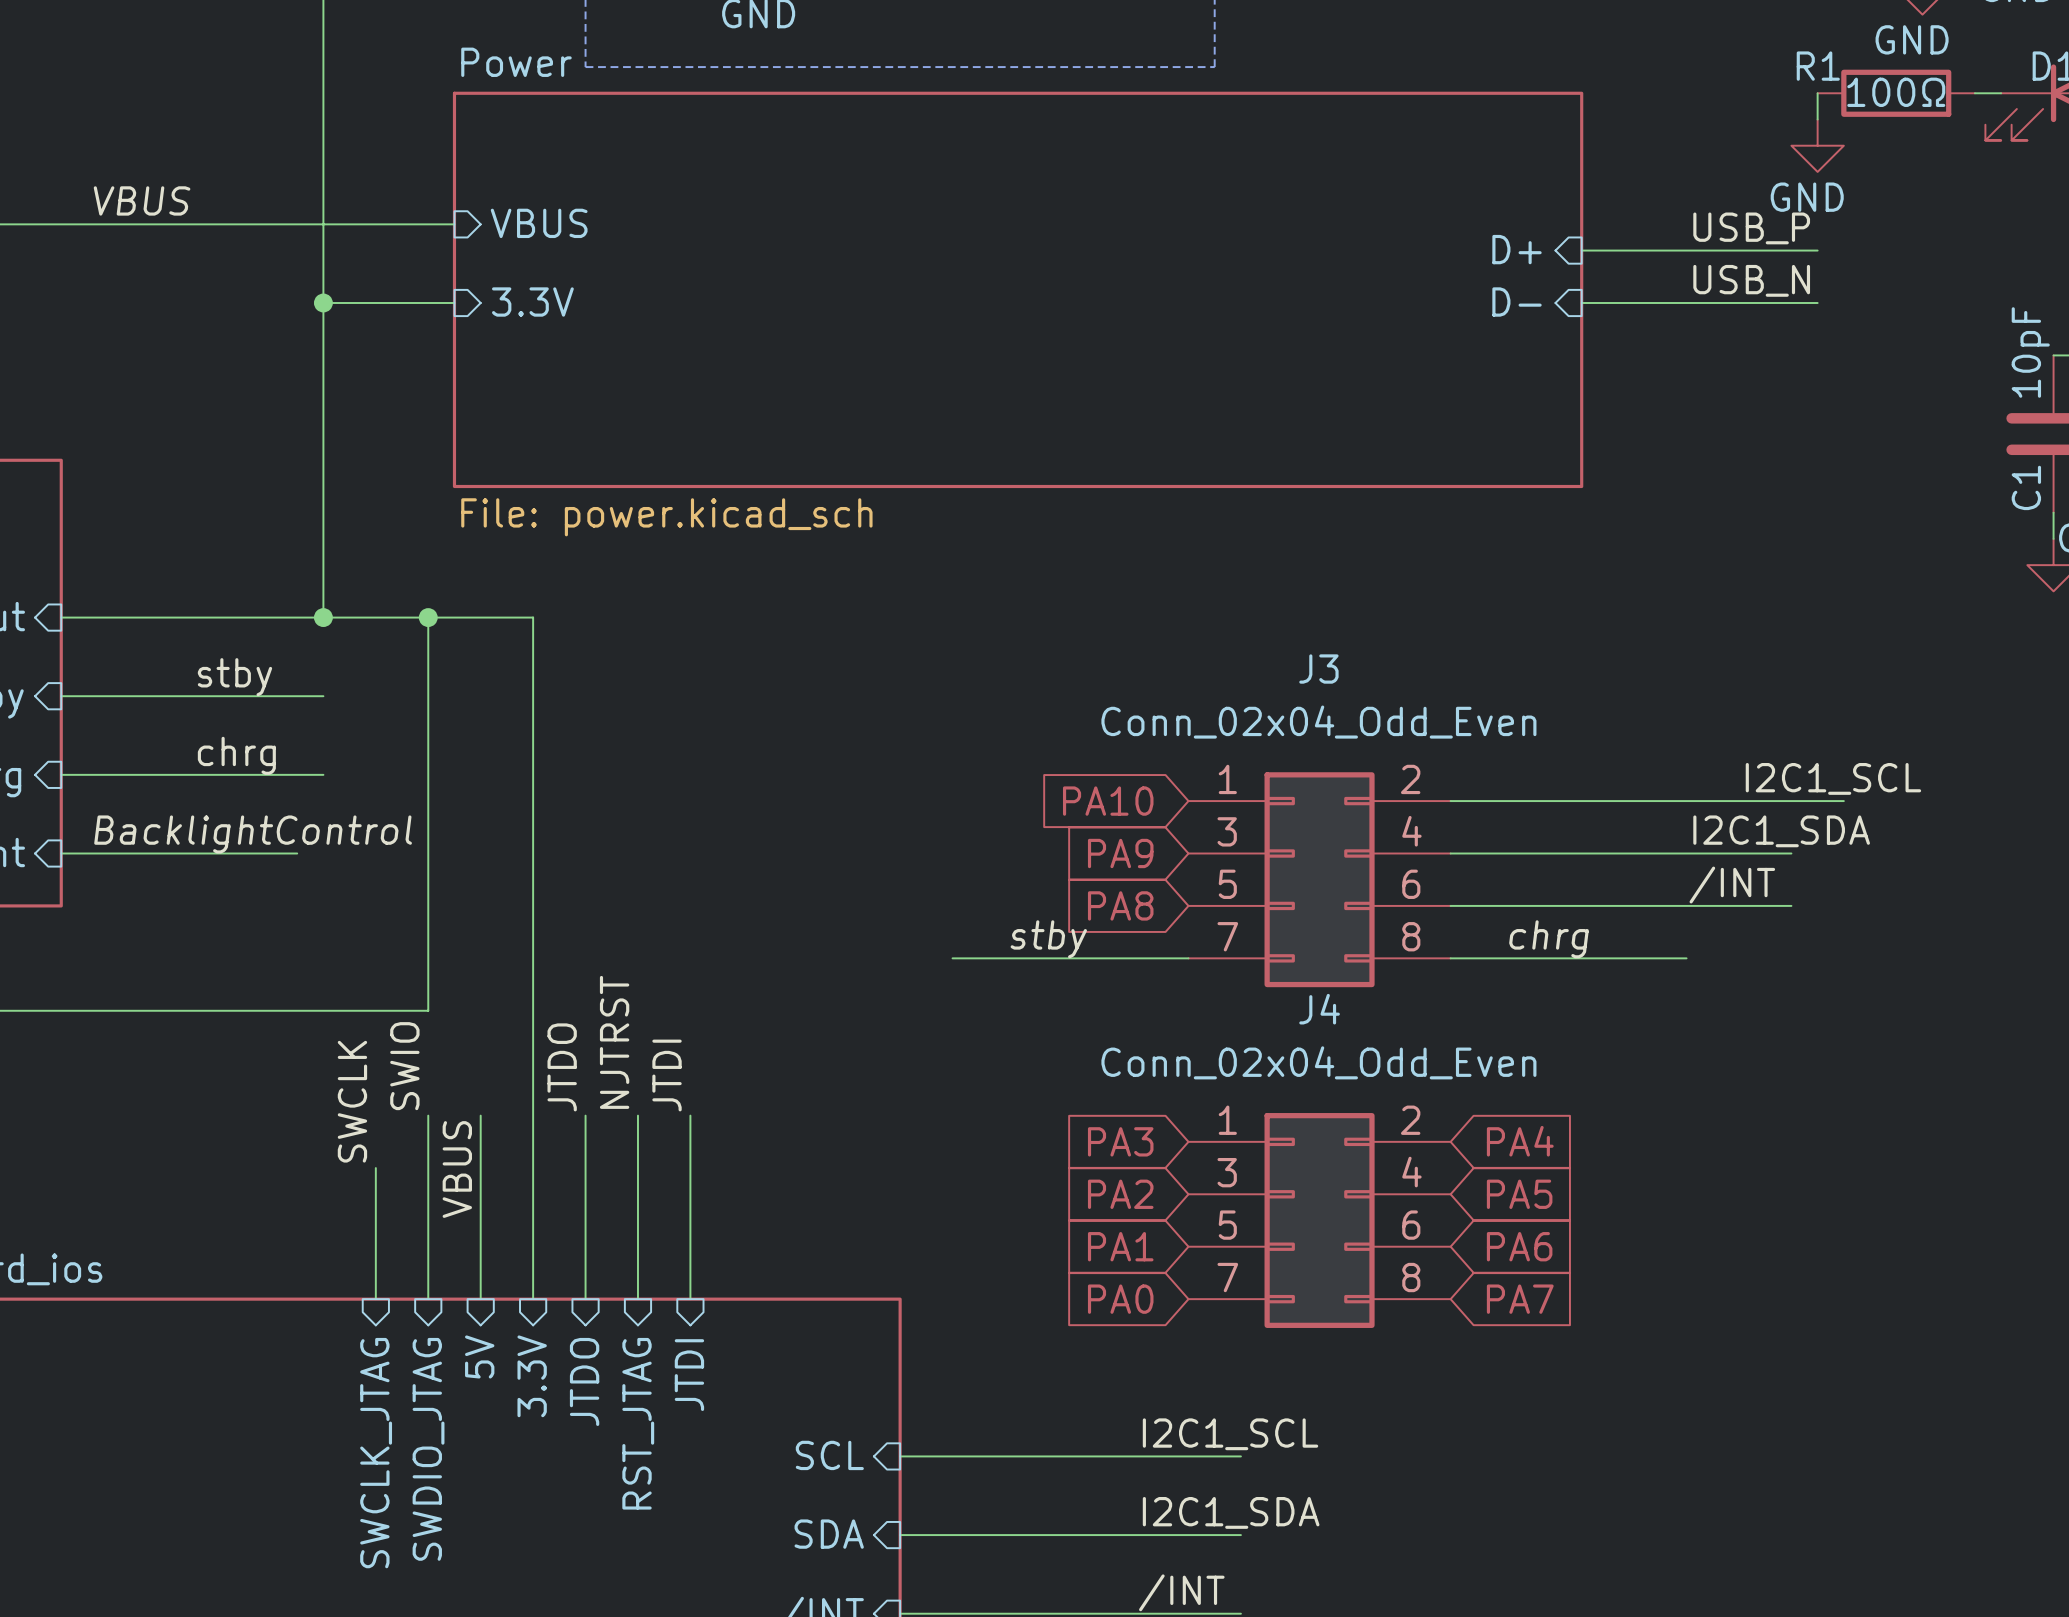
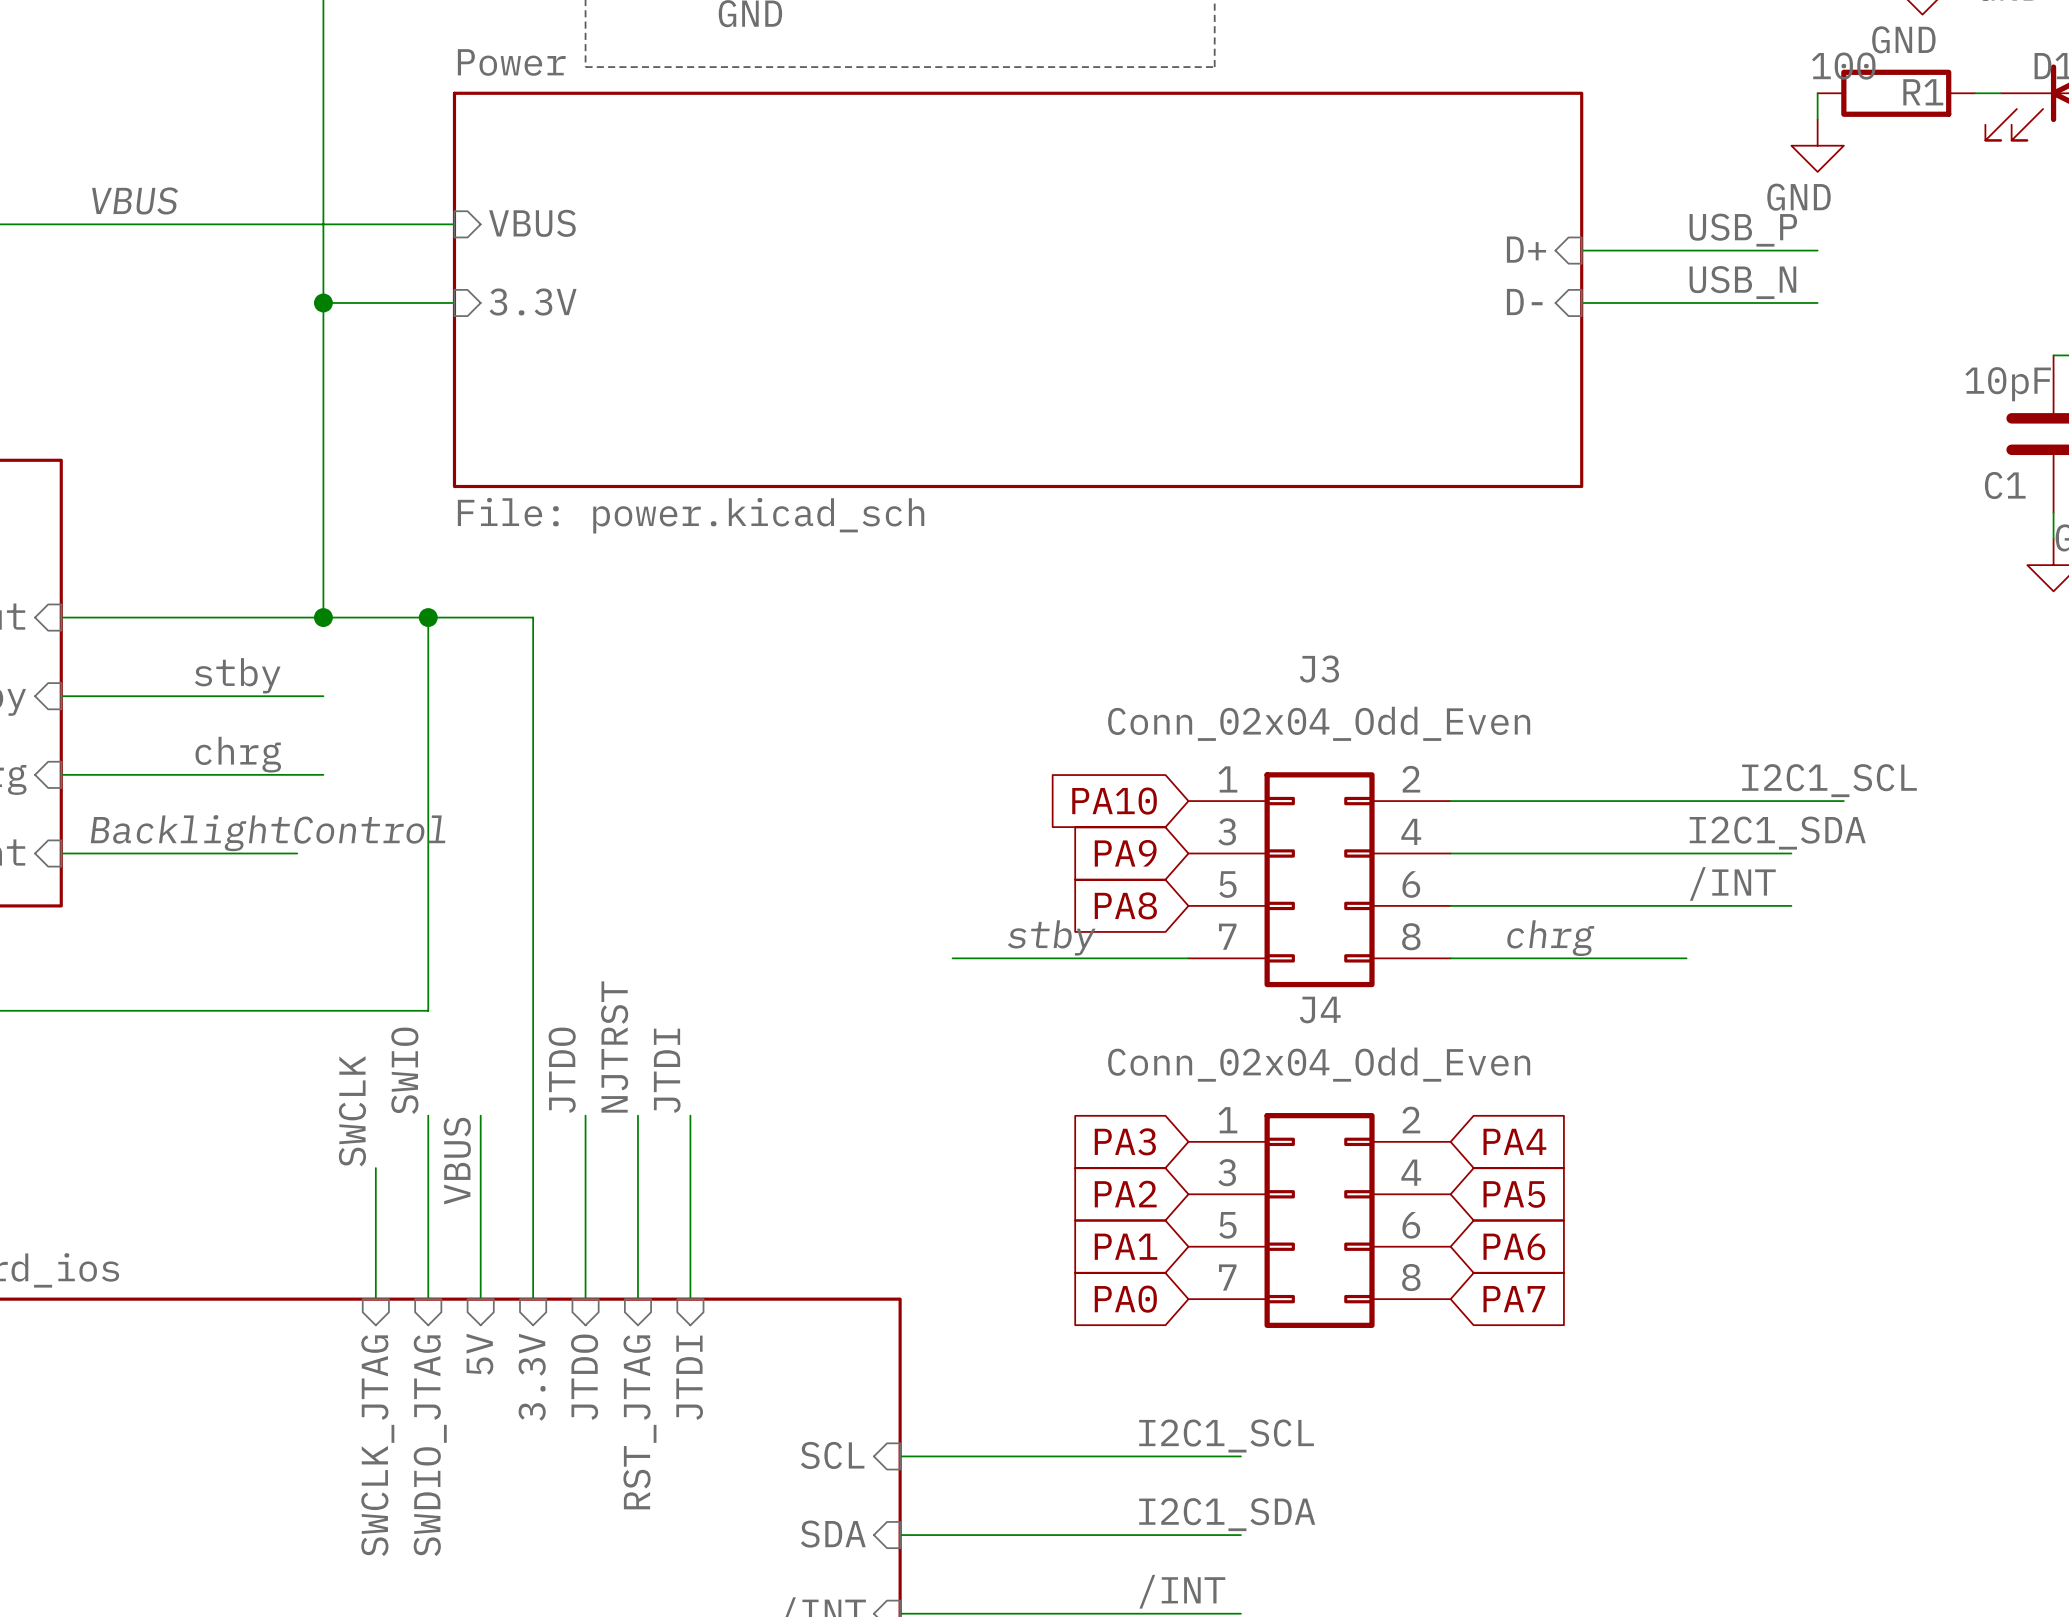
R1 name position: R1 (1818, 66) -> R1 (1923, 92)
R1 value: 100Ω (1896, 92) -> 100 (1843, 66)
C1 value rotation: 0° (2030, 352) -> 90° clockwise (2008, 384)
C1 name rotation: 0° (2026, 487) -> 90° clockwise (2005, 485)

